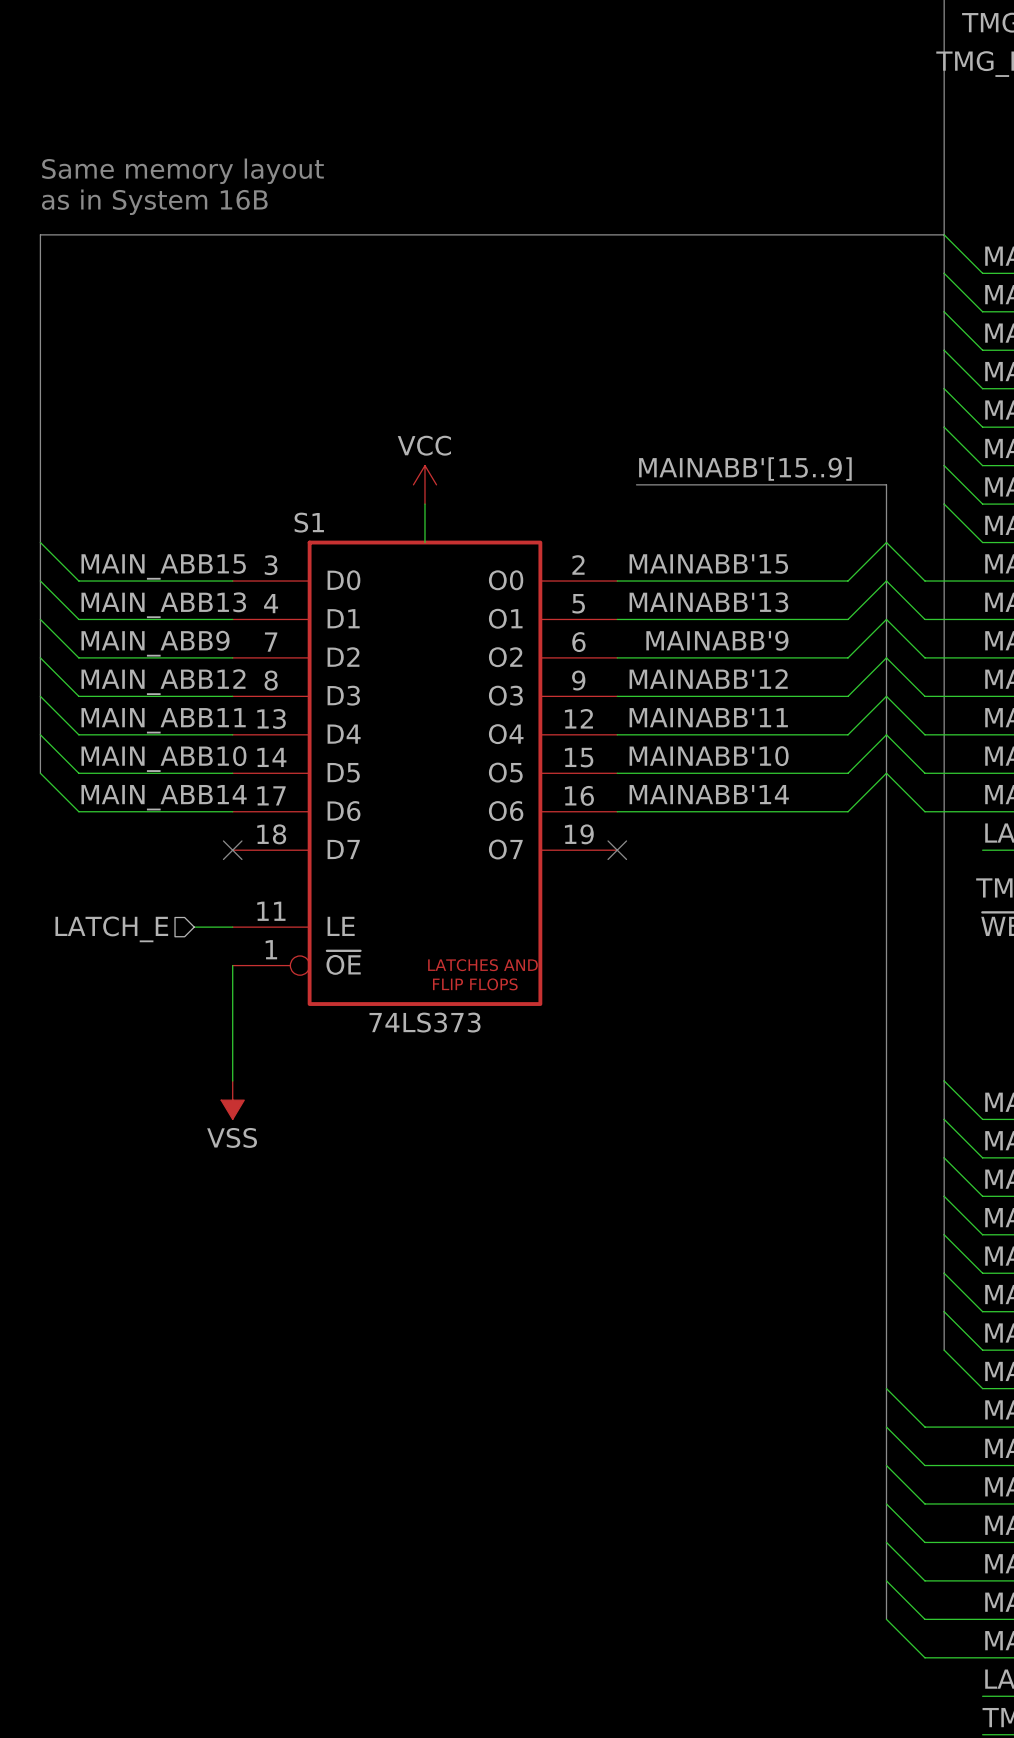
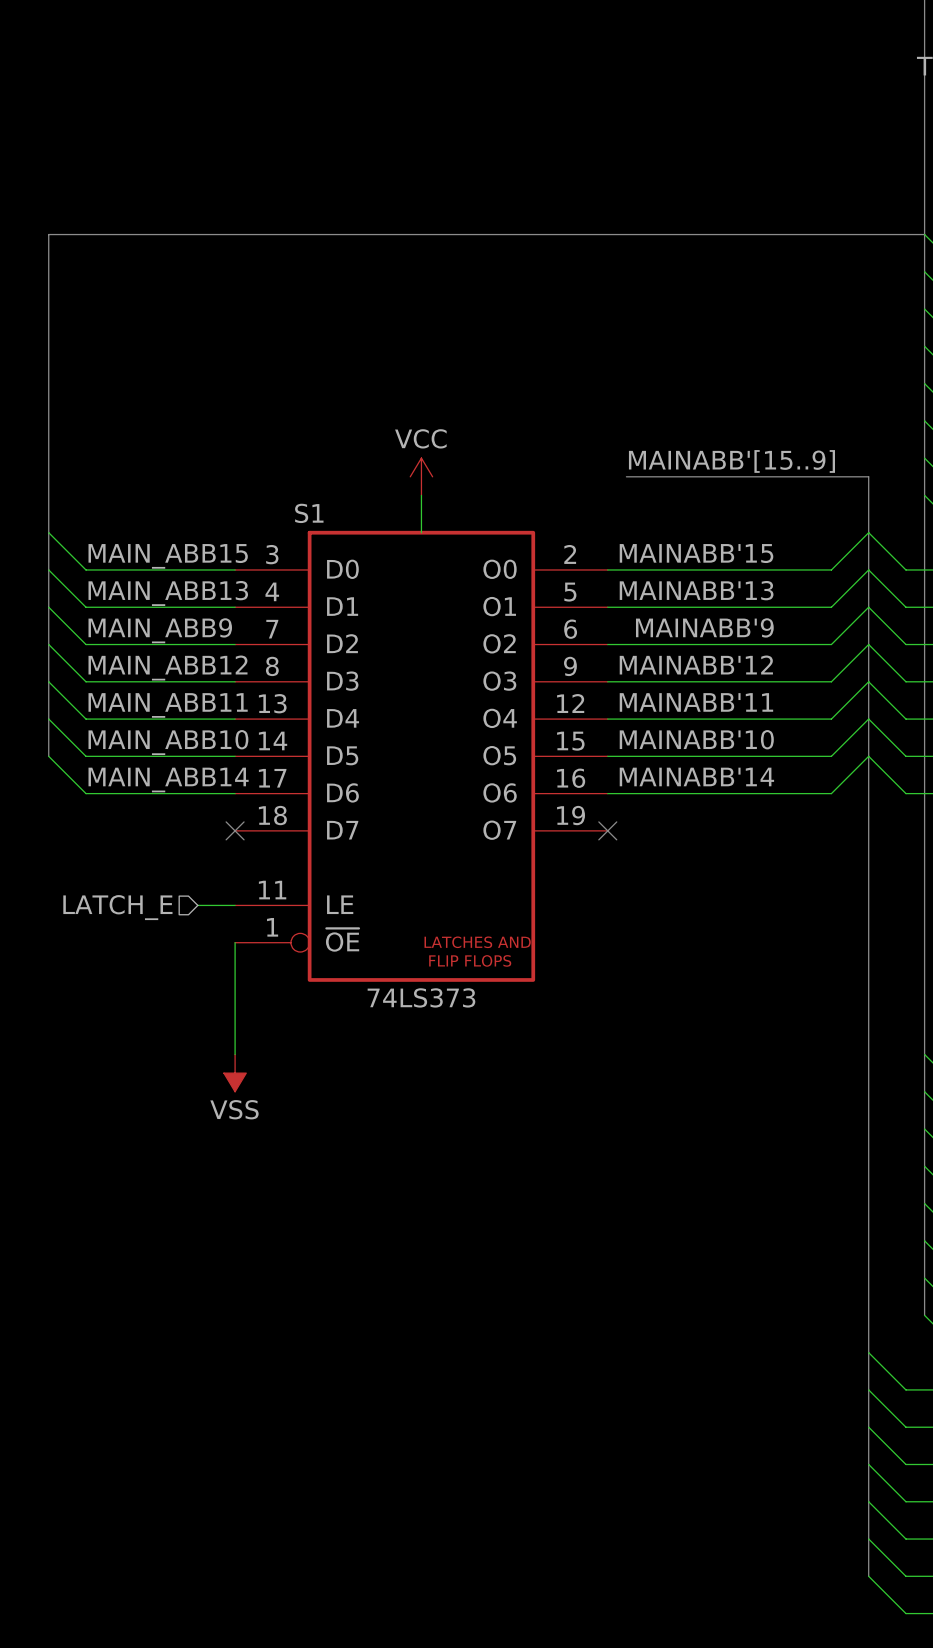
text: Same memory layout (183, 171) -> none
text: as in System 16B (154, 202) -> none

